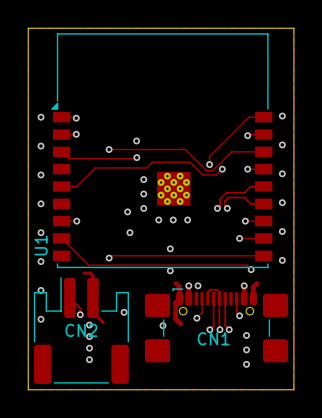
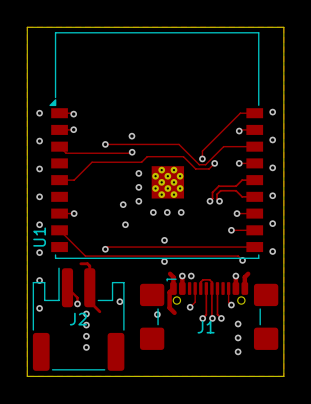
CN2 name: CN2 (81, 330) -> J2 (78, 319)
CN1 name: CN1 (213, 338) -> J1 (206, 327)

